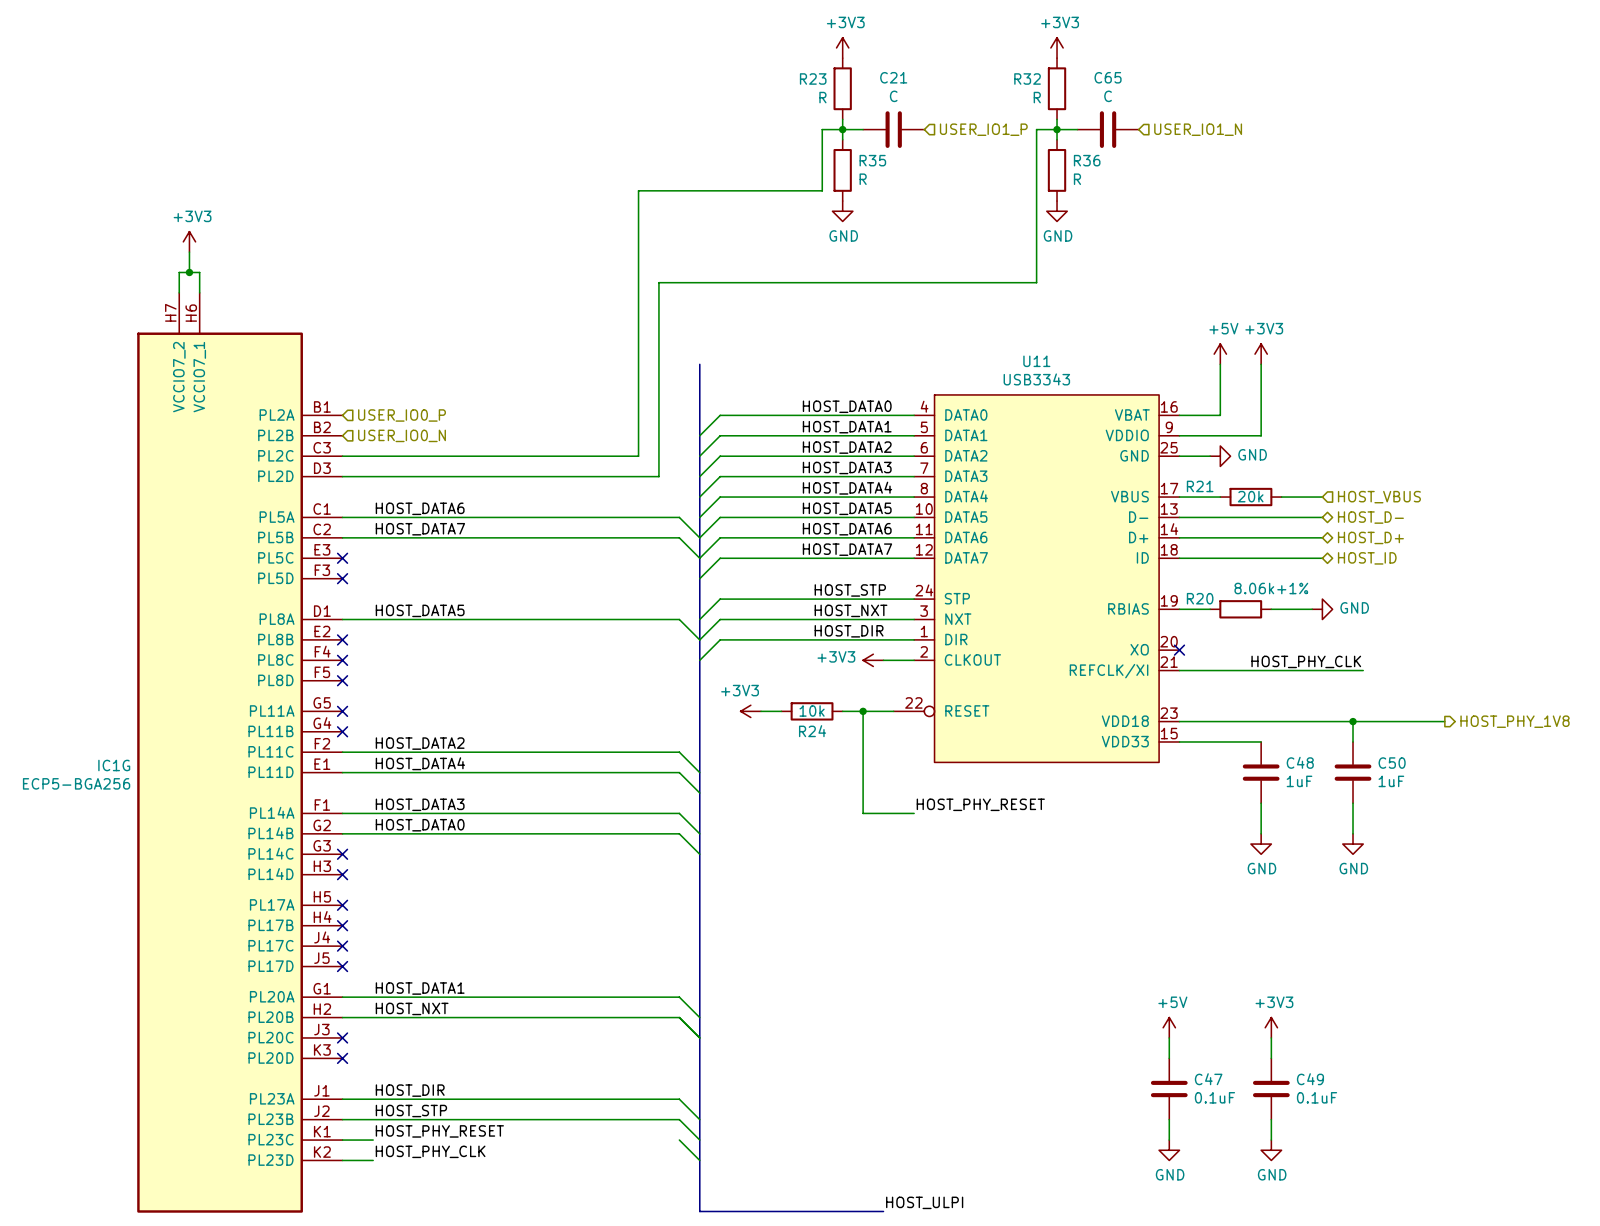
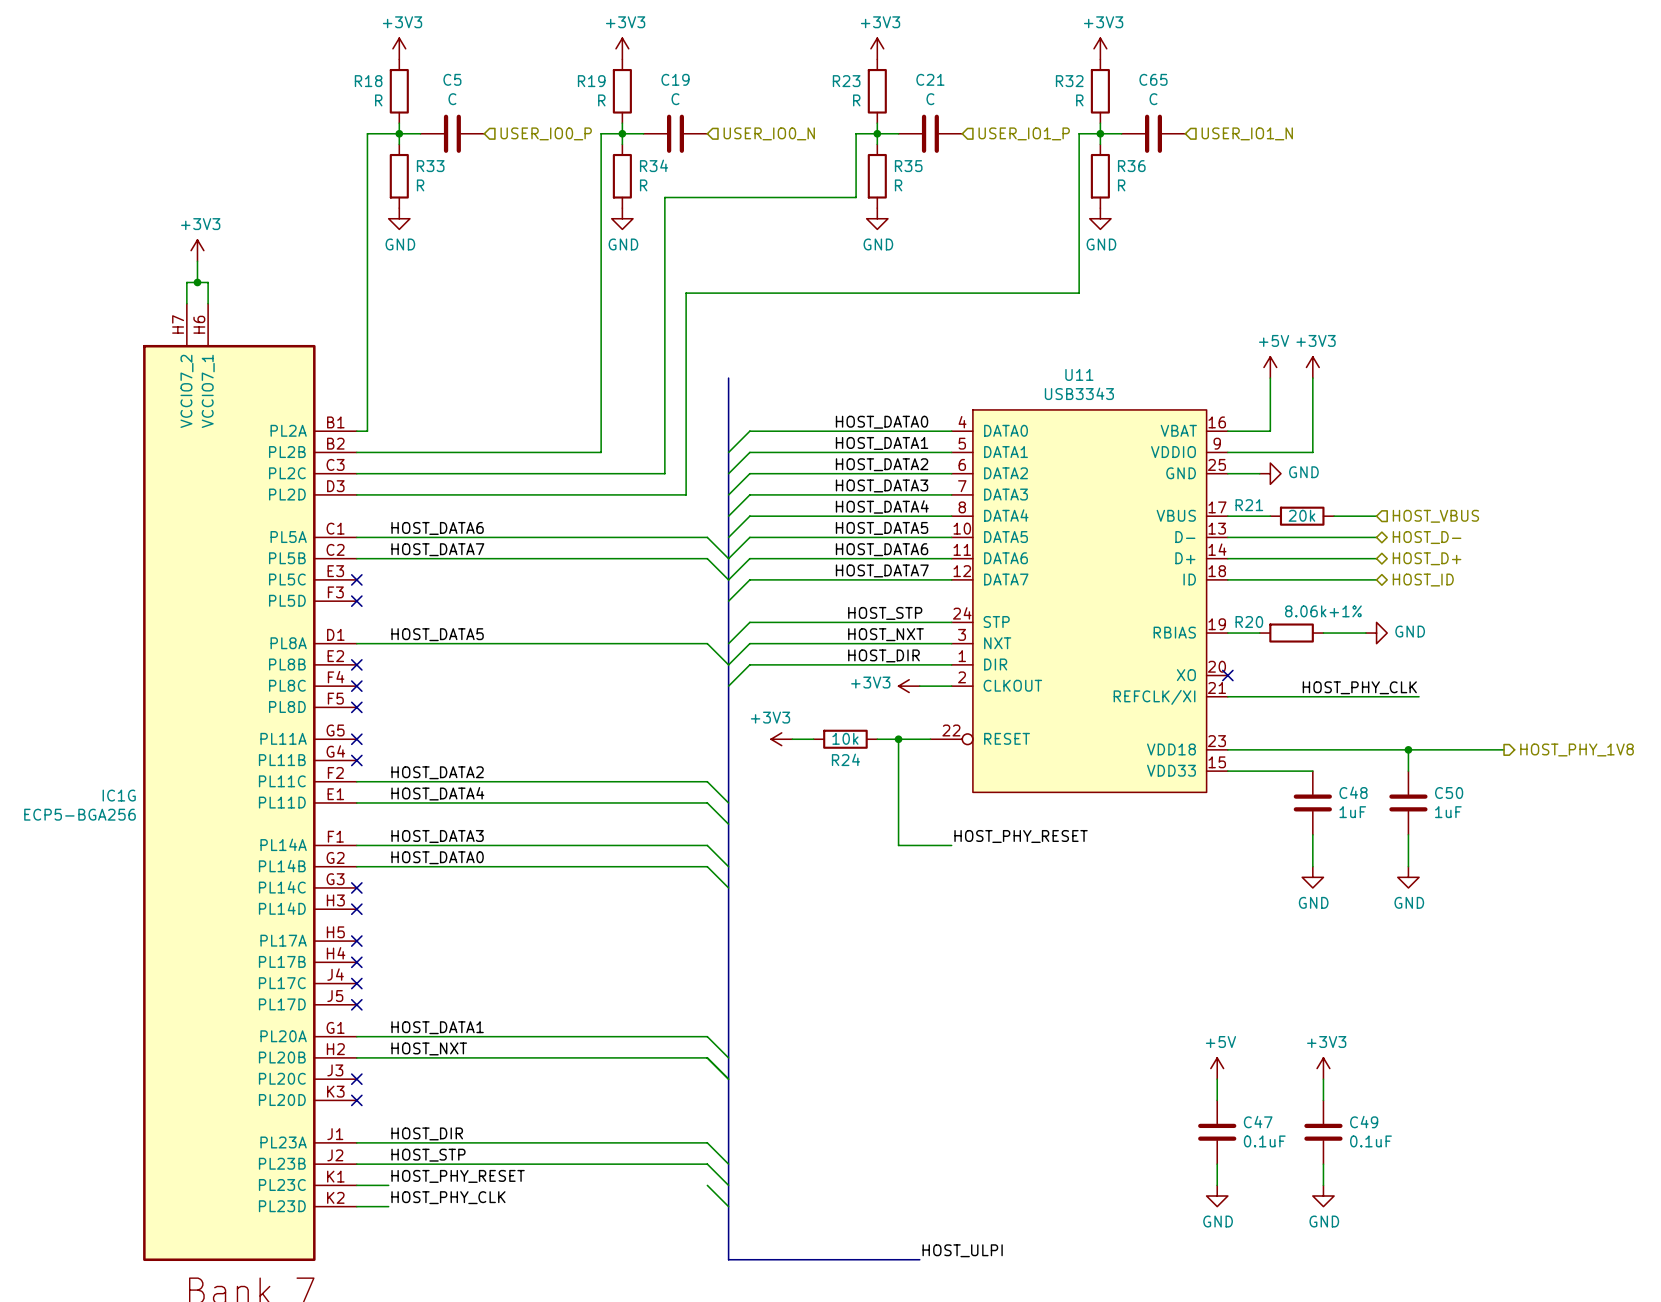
power symbol: none -> +3V3 (399, 48)
power symbol: none -> +3V3 (622, 48)
R18: none -> R (399, 91)
R19: none -> R (622, 91)
wire: none -> (399, 123) (399, 144)
wire: none -> (622, 123) (622, 144)
junction: none -> (399, 133)
wire: none -> (420, 133) (367, 133) (367, 431) (356, 431)
C5: none -> C (452, 133)
hierarchical label: none -> USER_IO0_P (546, 133)
junction: none -> (622, 133)
wire: none -> (643, 133) (601, 133) (601, 452) (356, 452)
C19: none -> C (675, 133)
hierarchical label: none -> USER_IO0_N (769, 133)
R33: none -> R (399, 176)
R34: none -> R (622, 176)
power symbol: none -> GND (399, 218)
power symbol: none -> GND (622, 218)
hierarchical label: USER_IO0_P (402, 415) -> none
hierarchical label: USER_IO0_N (402, 435) -> none

